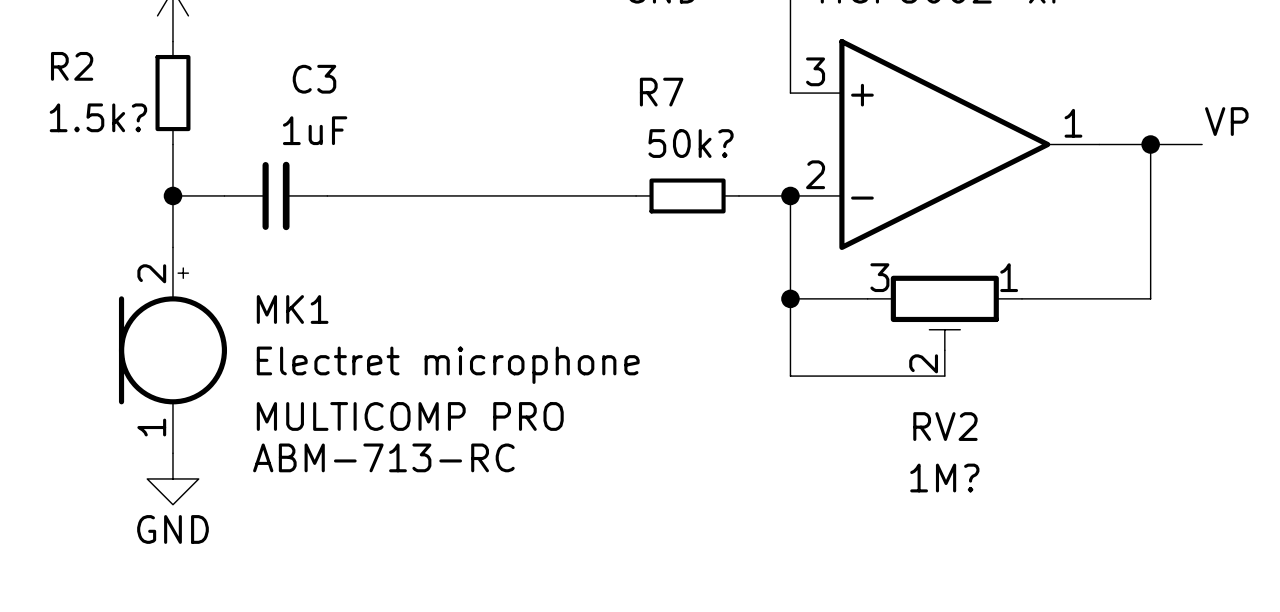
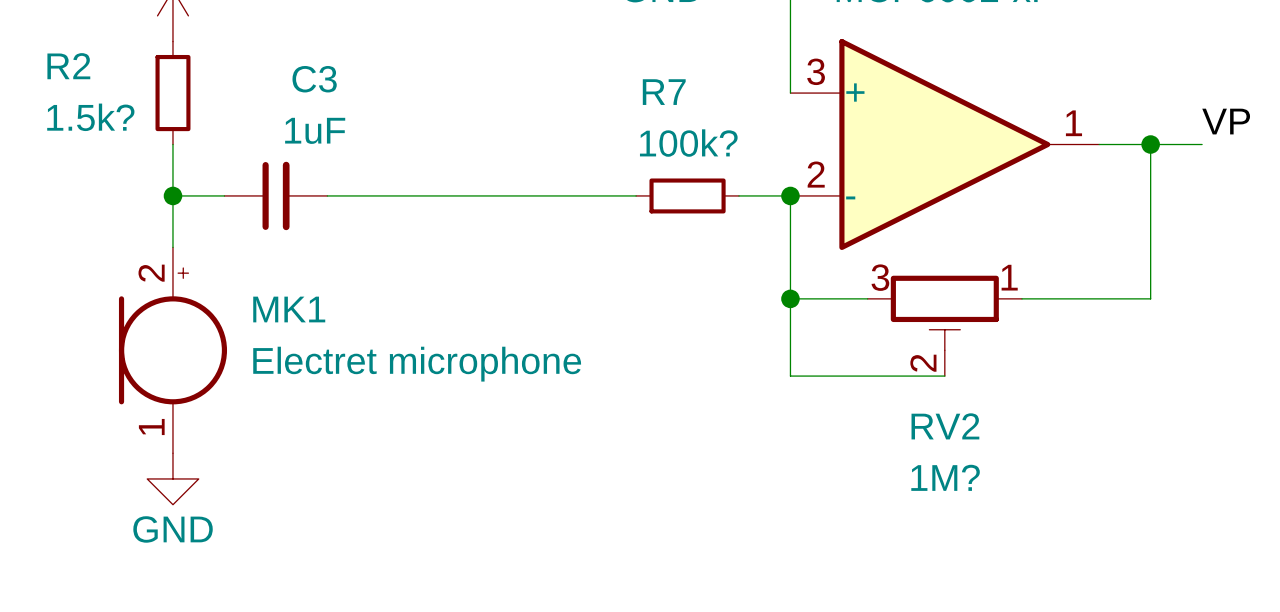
R7 value: 50k? (691, 143) -> 100k? (688, 143)
text: MULTICOMP PRO (410, 416) -> none
text: ABM-713-RC (383, 457) -> none

